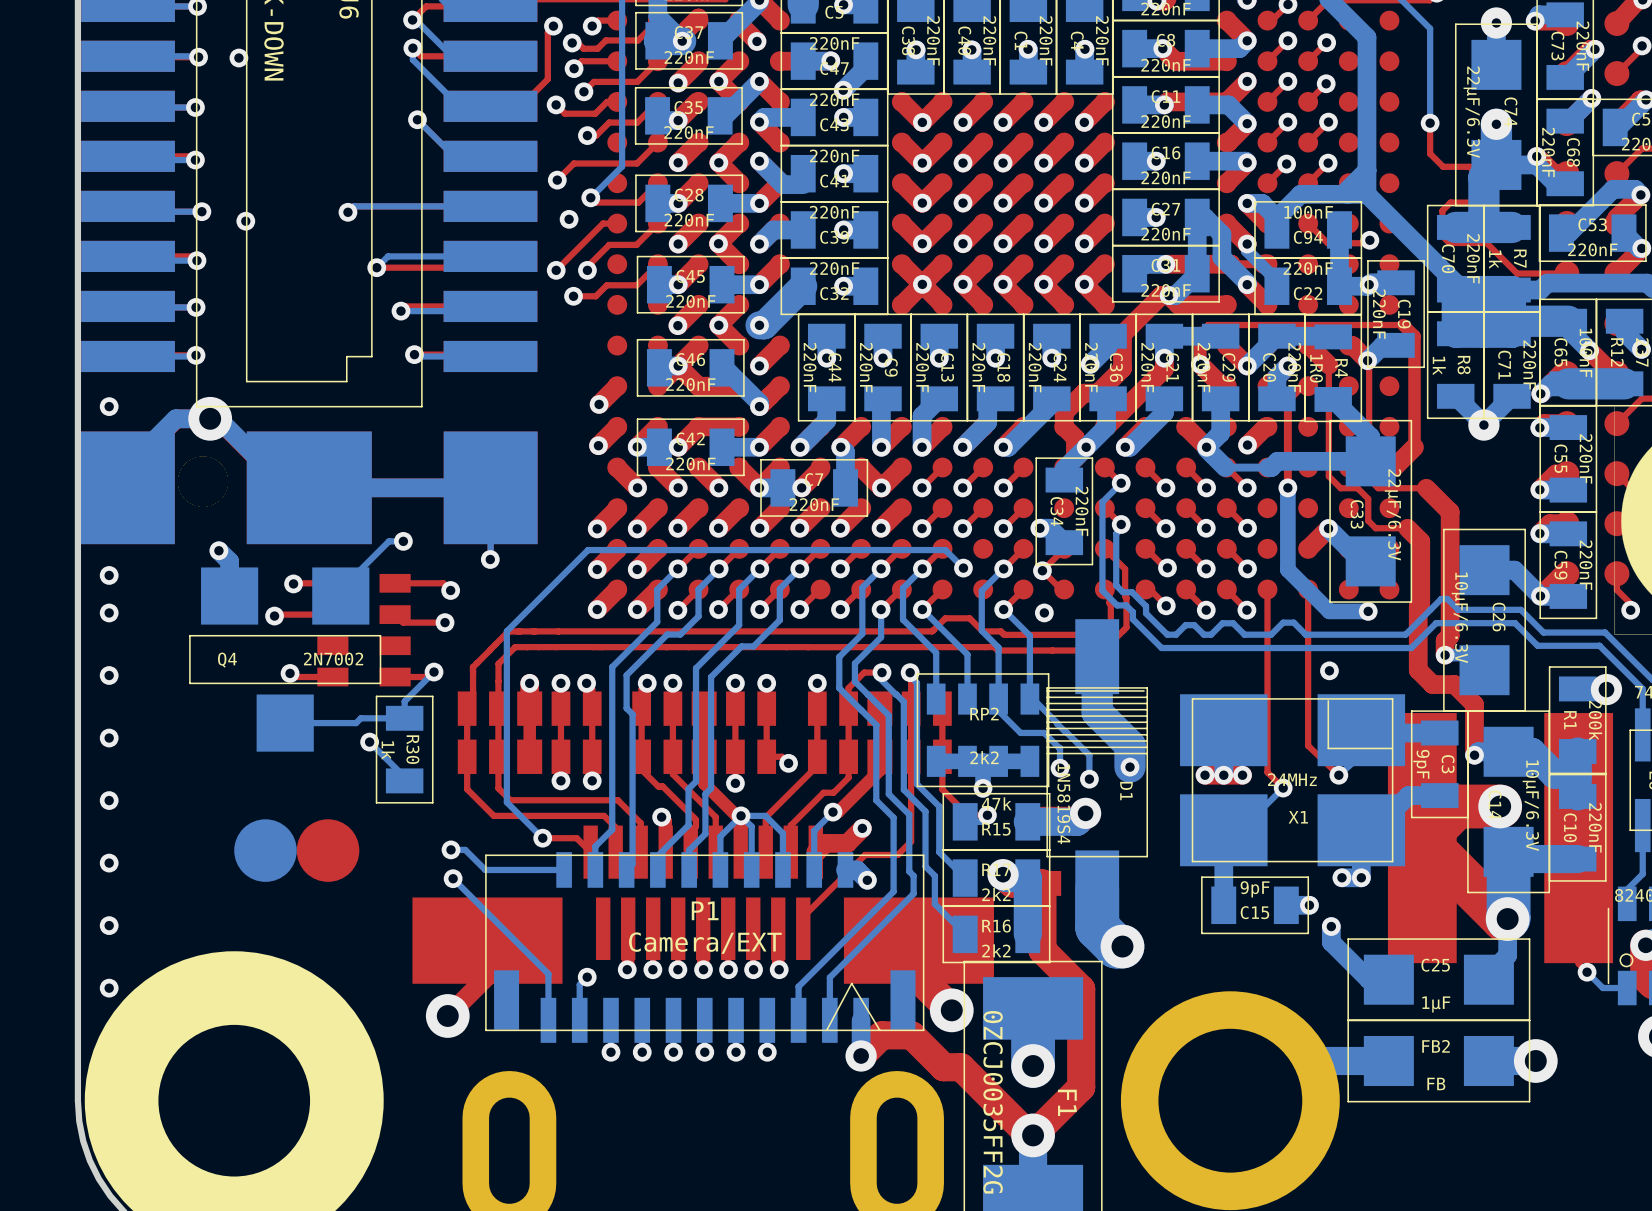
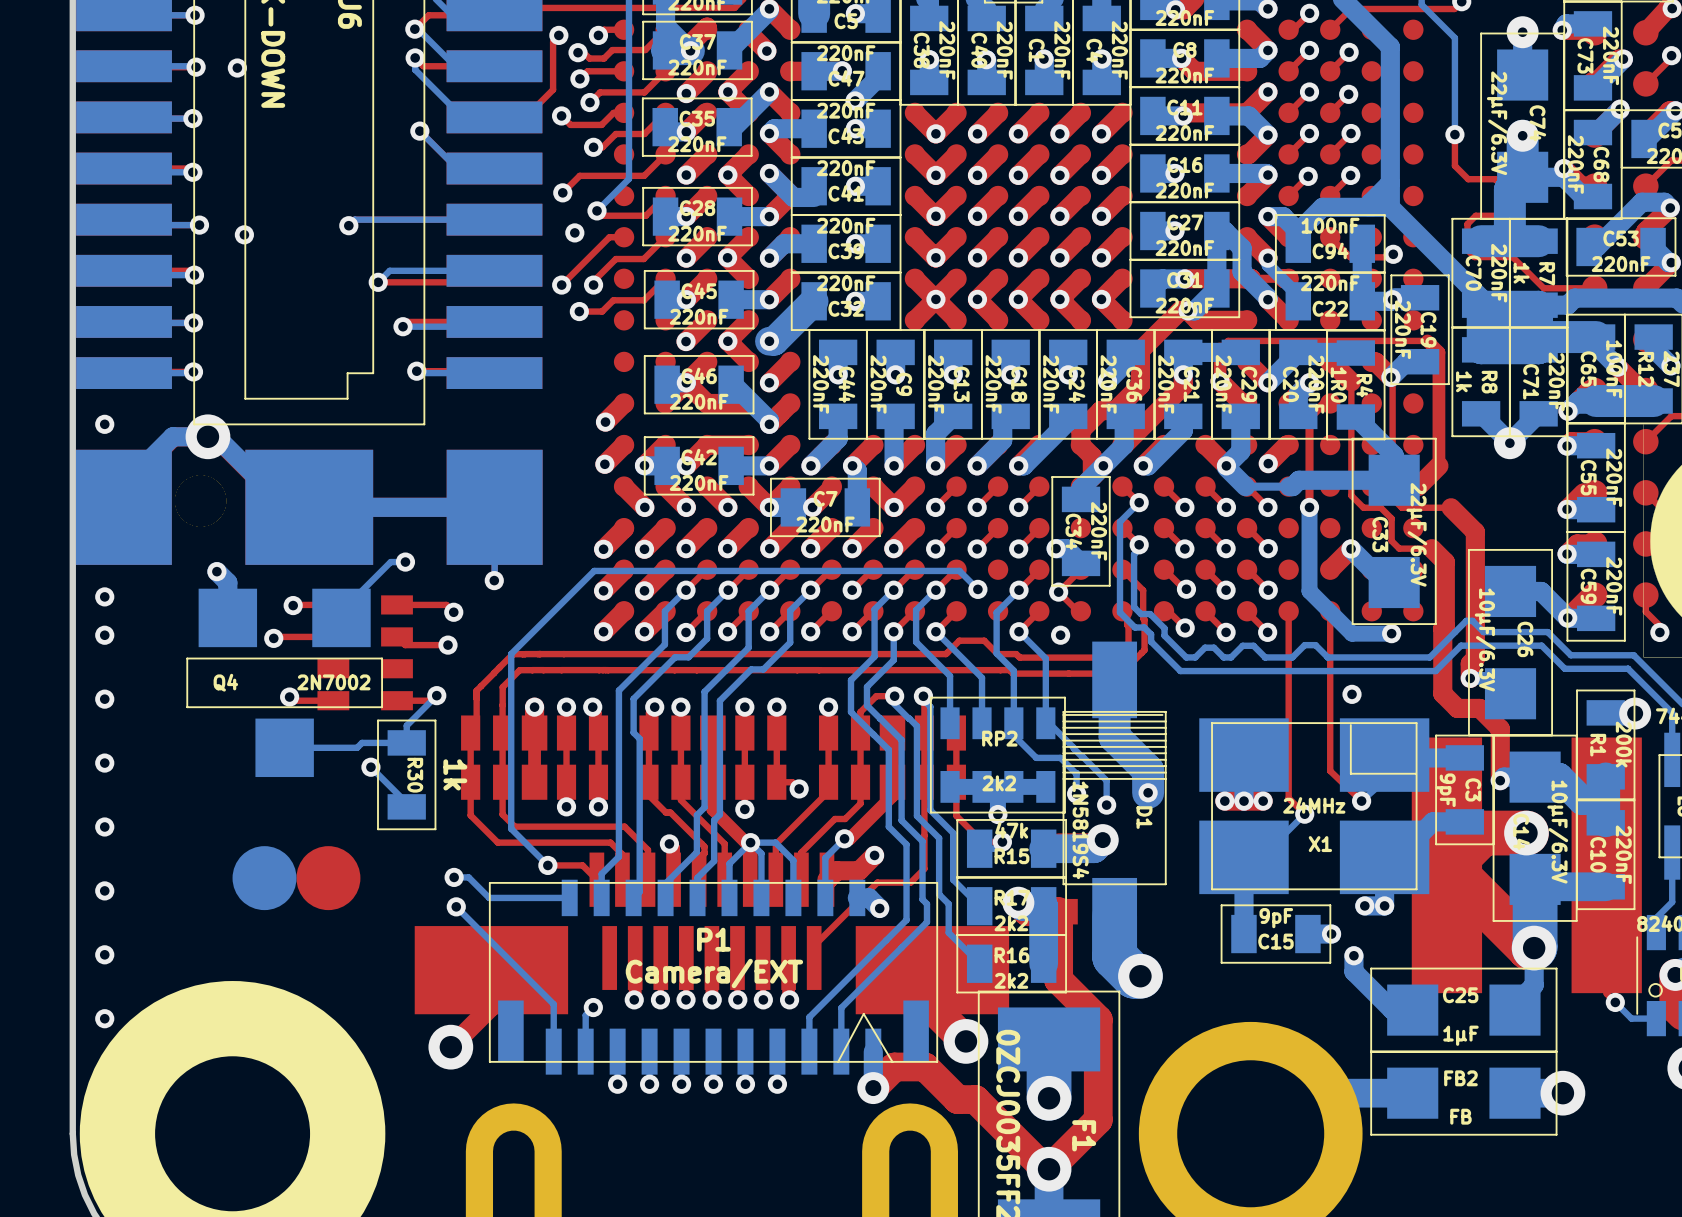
R30 value position: 1k (388, 750) -> 1k (455, 774)

